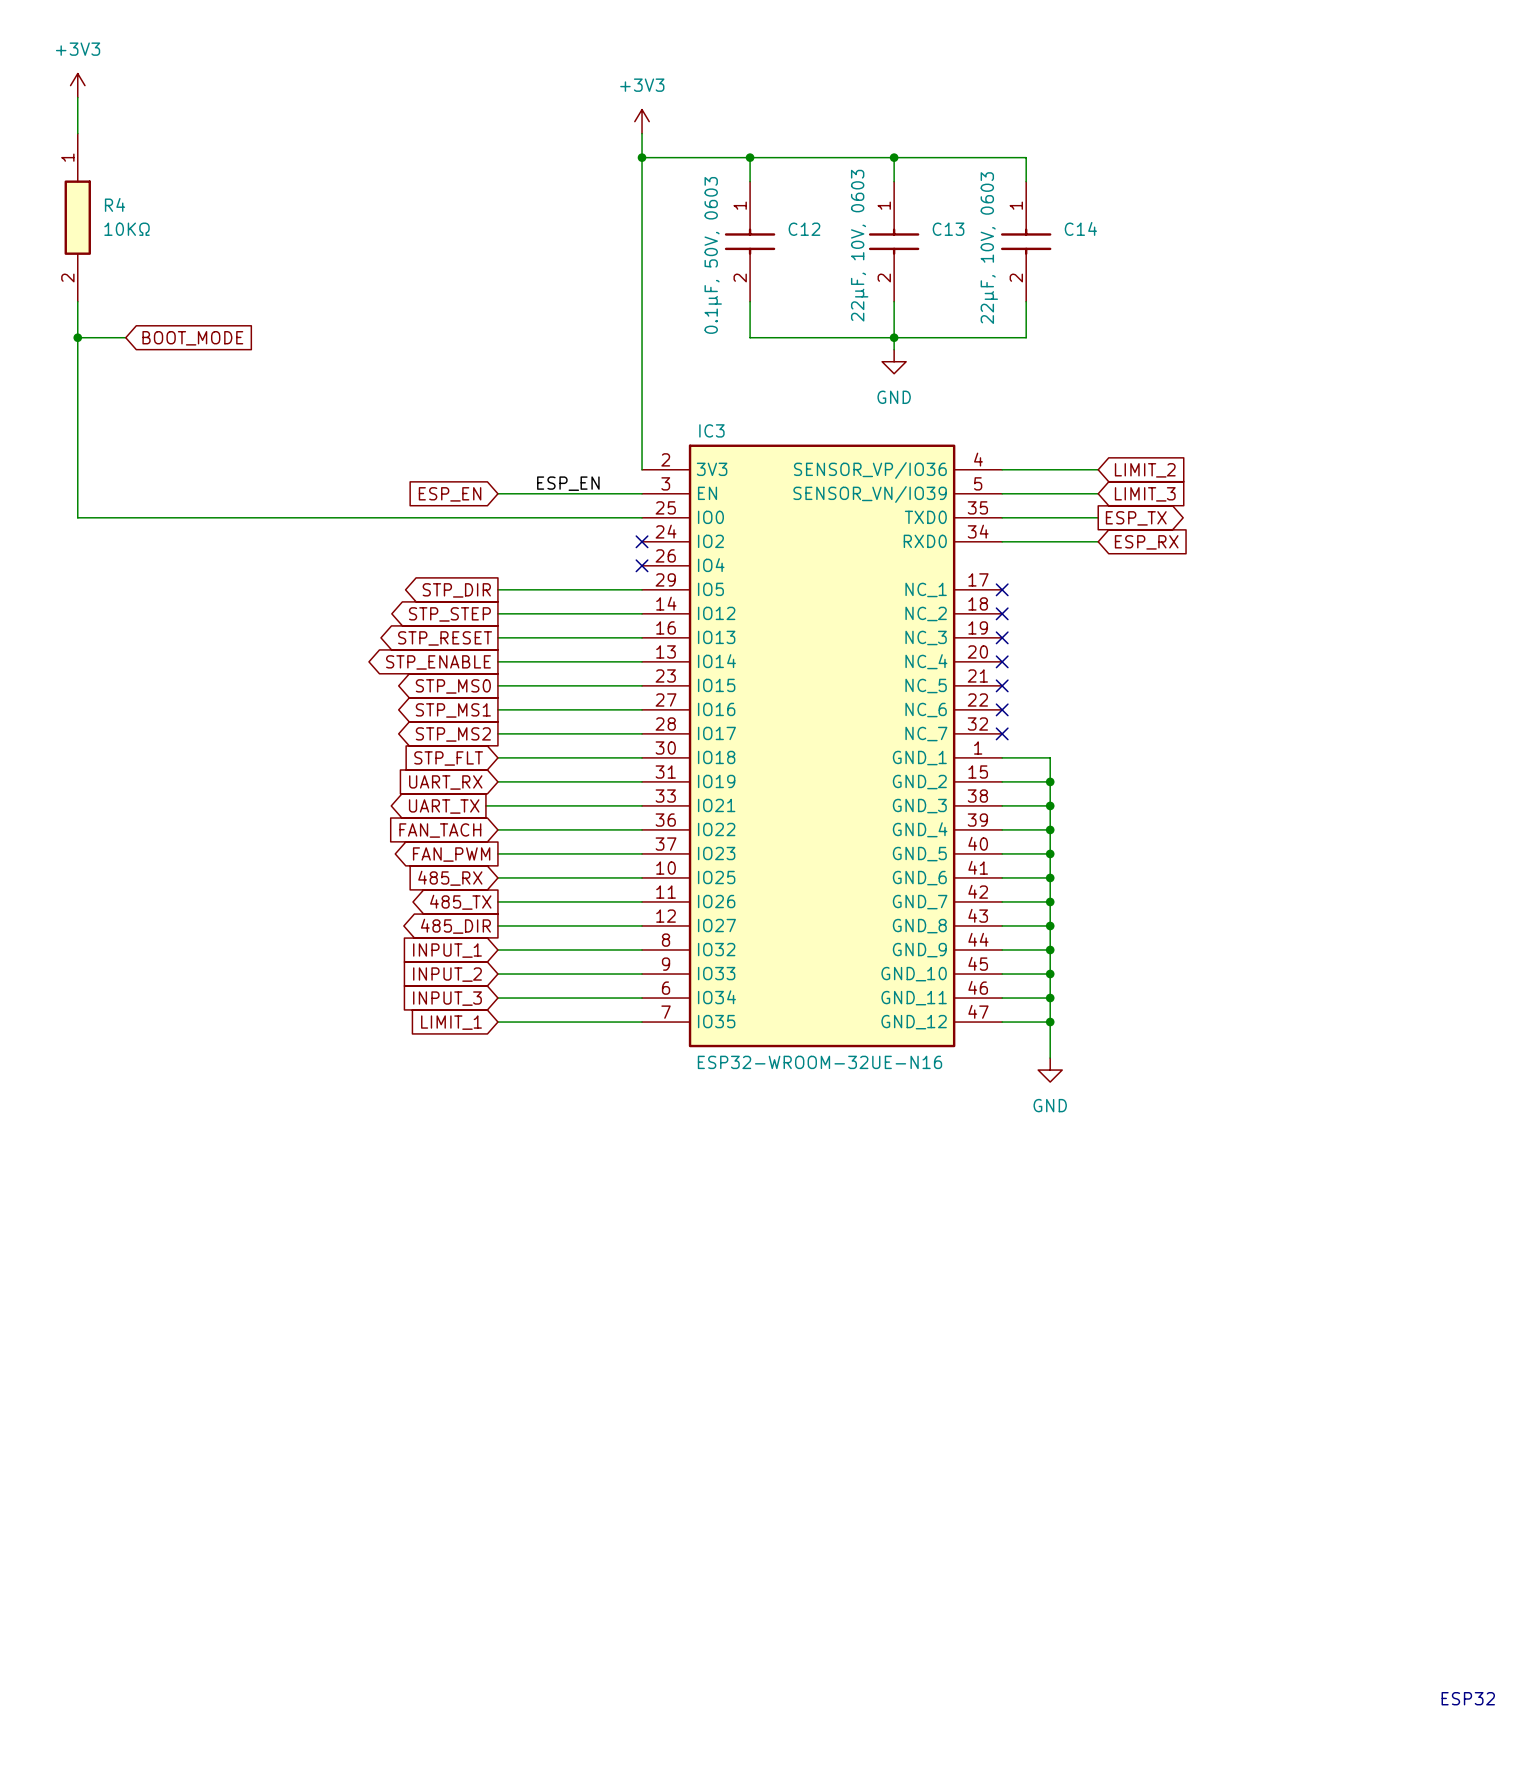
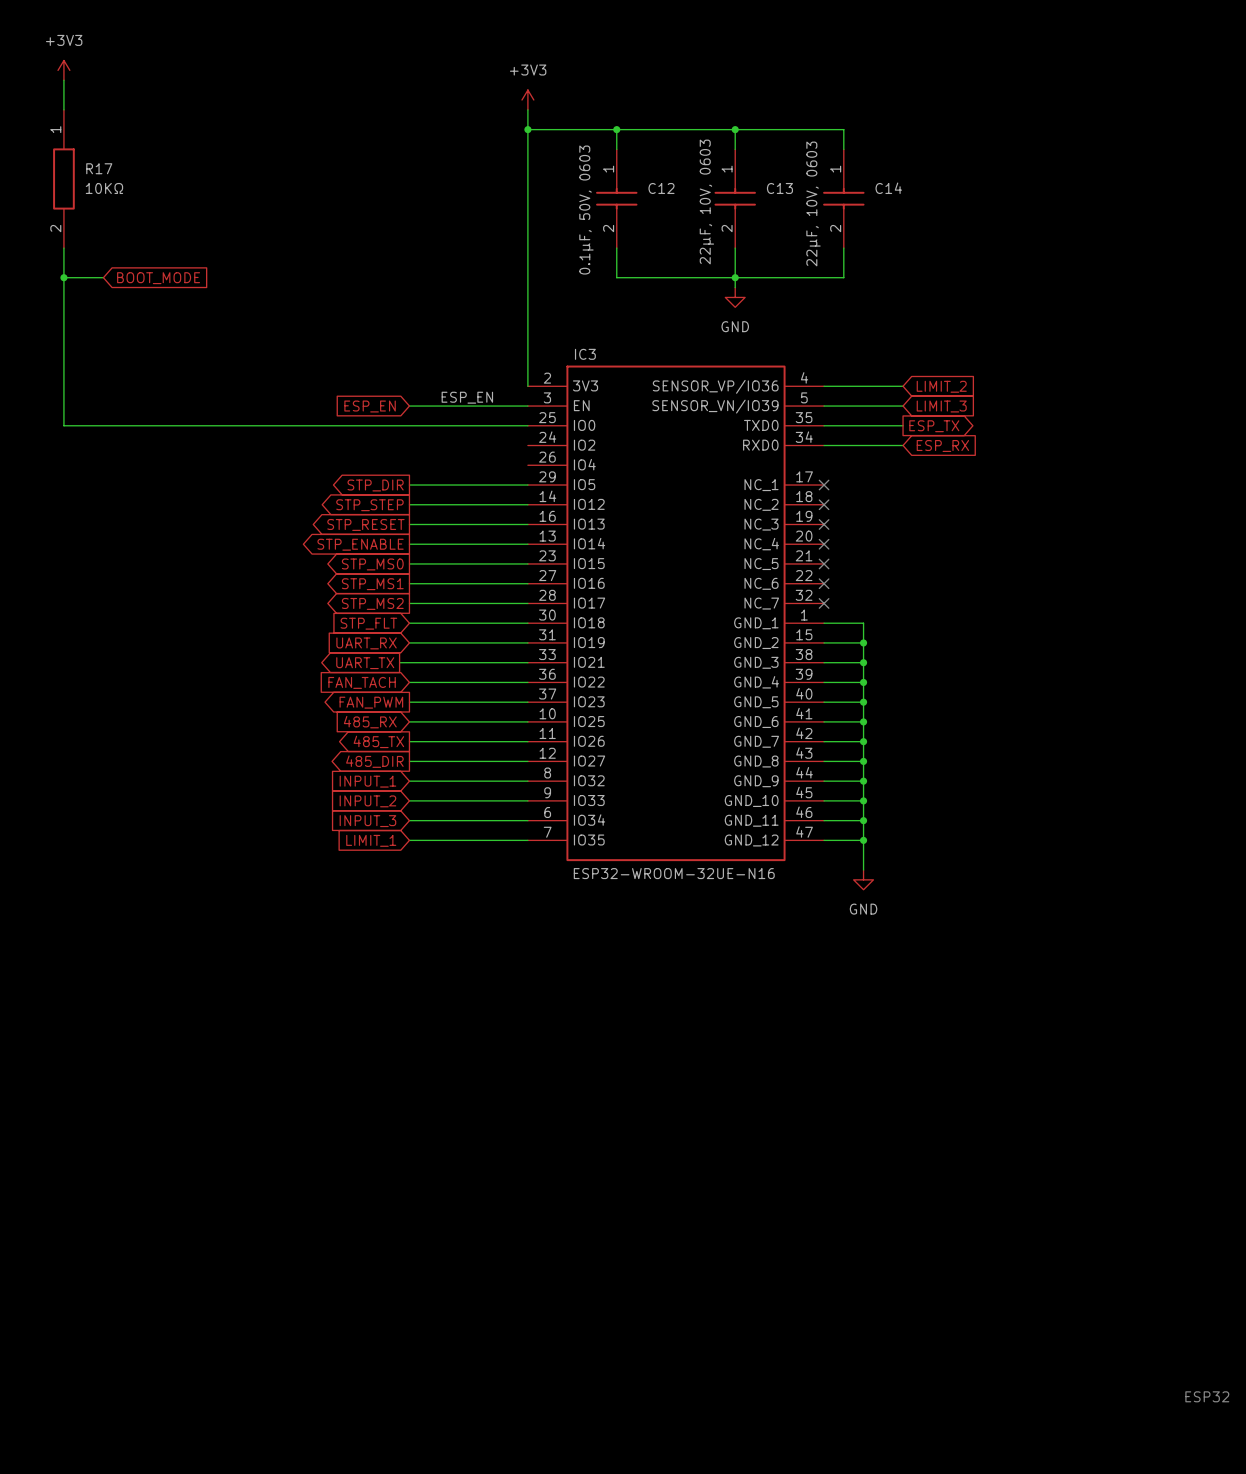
R4 name: R4 (115, 204) -> R17 (99, 168)
no-connect mark: (642, 541) -> none
no-connect mark: (642, 565) -> none

